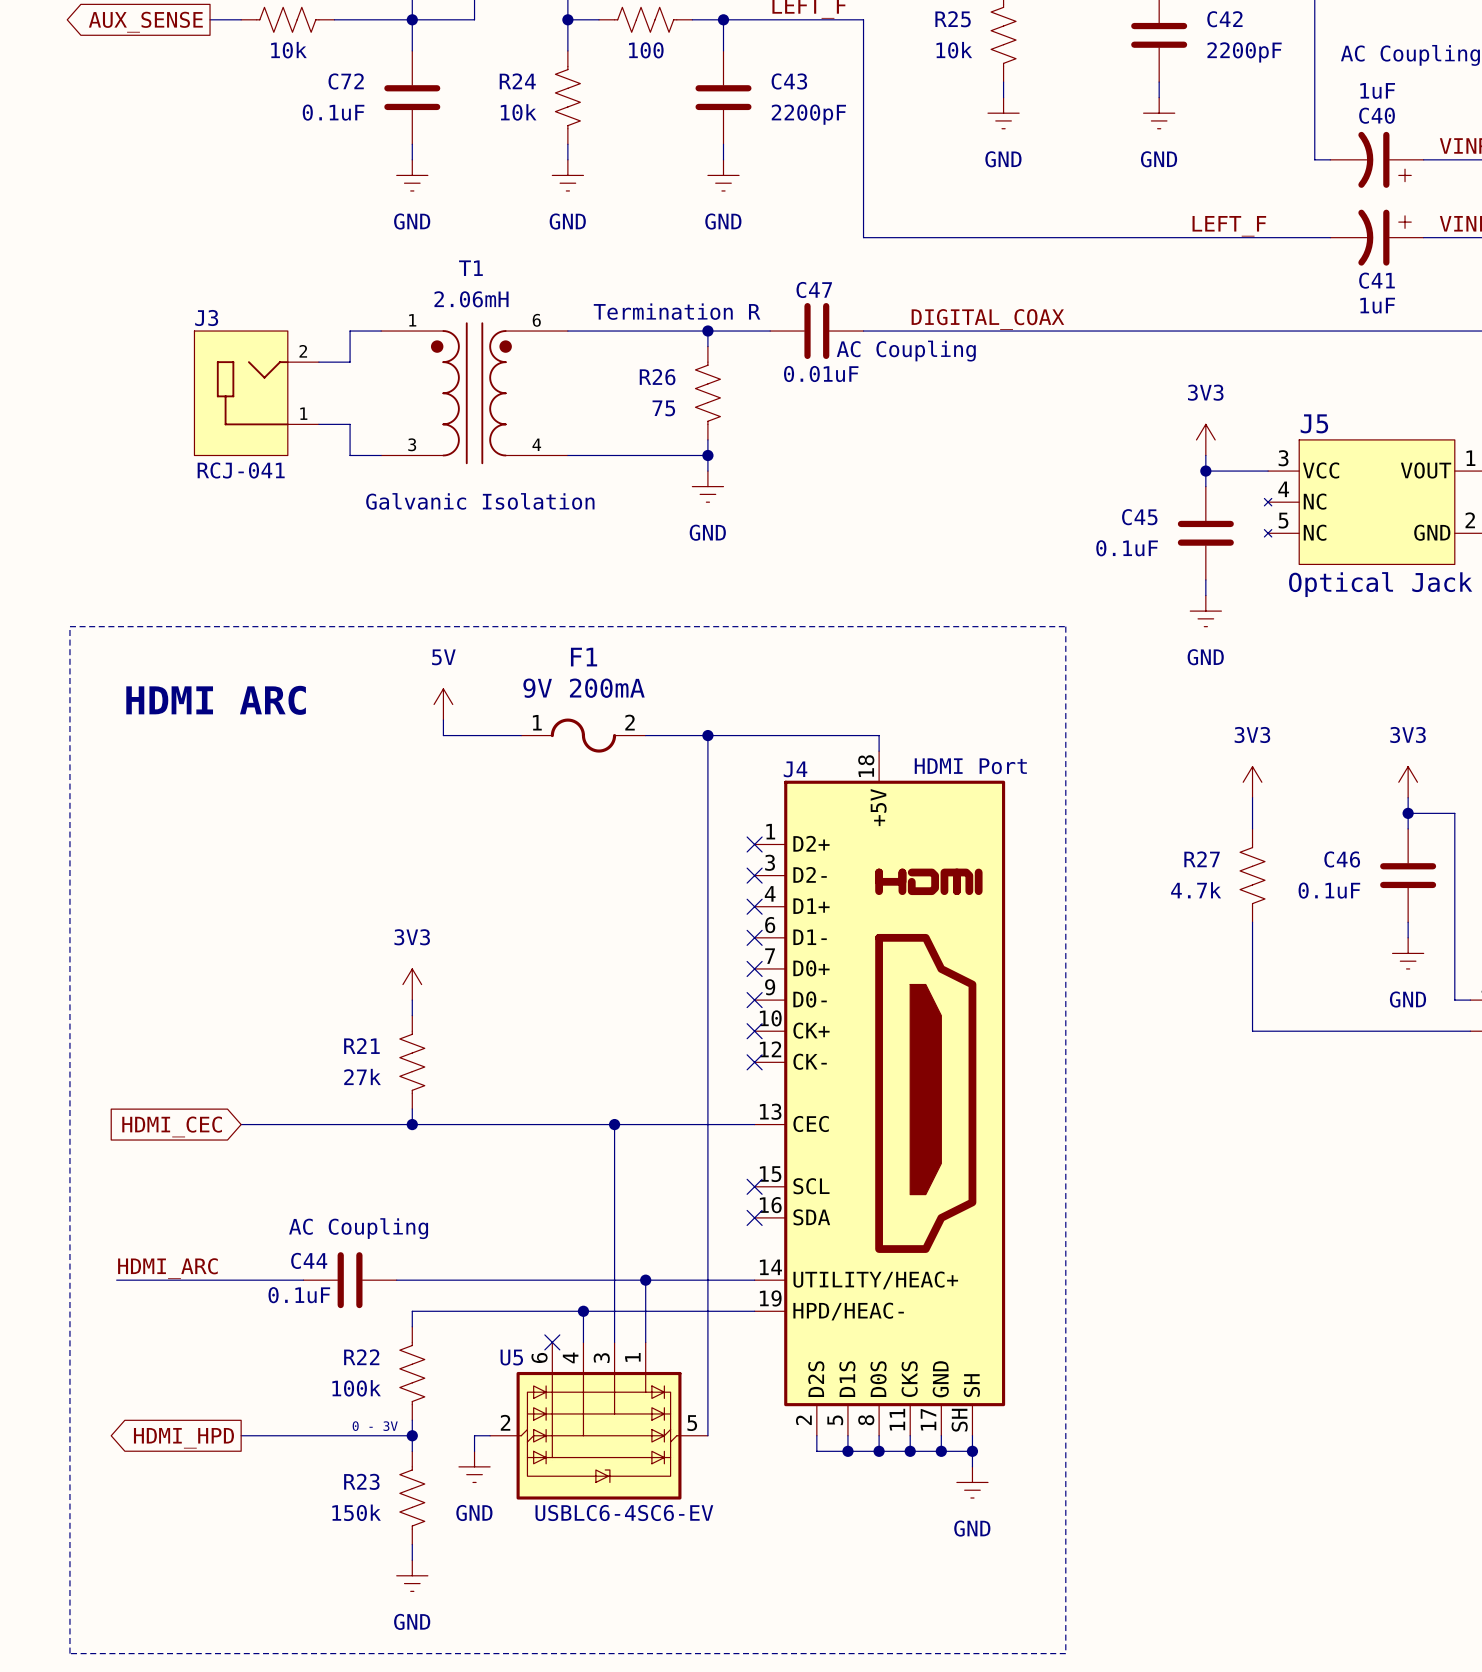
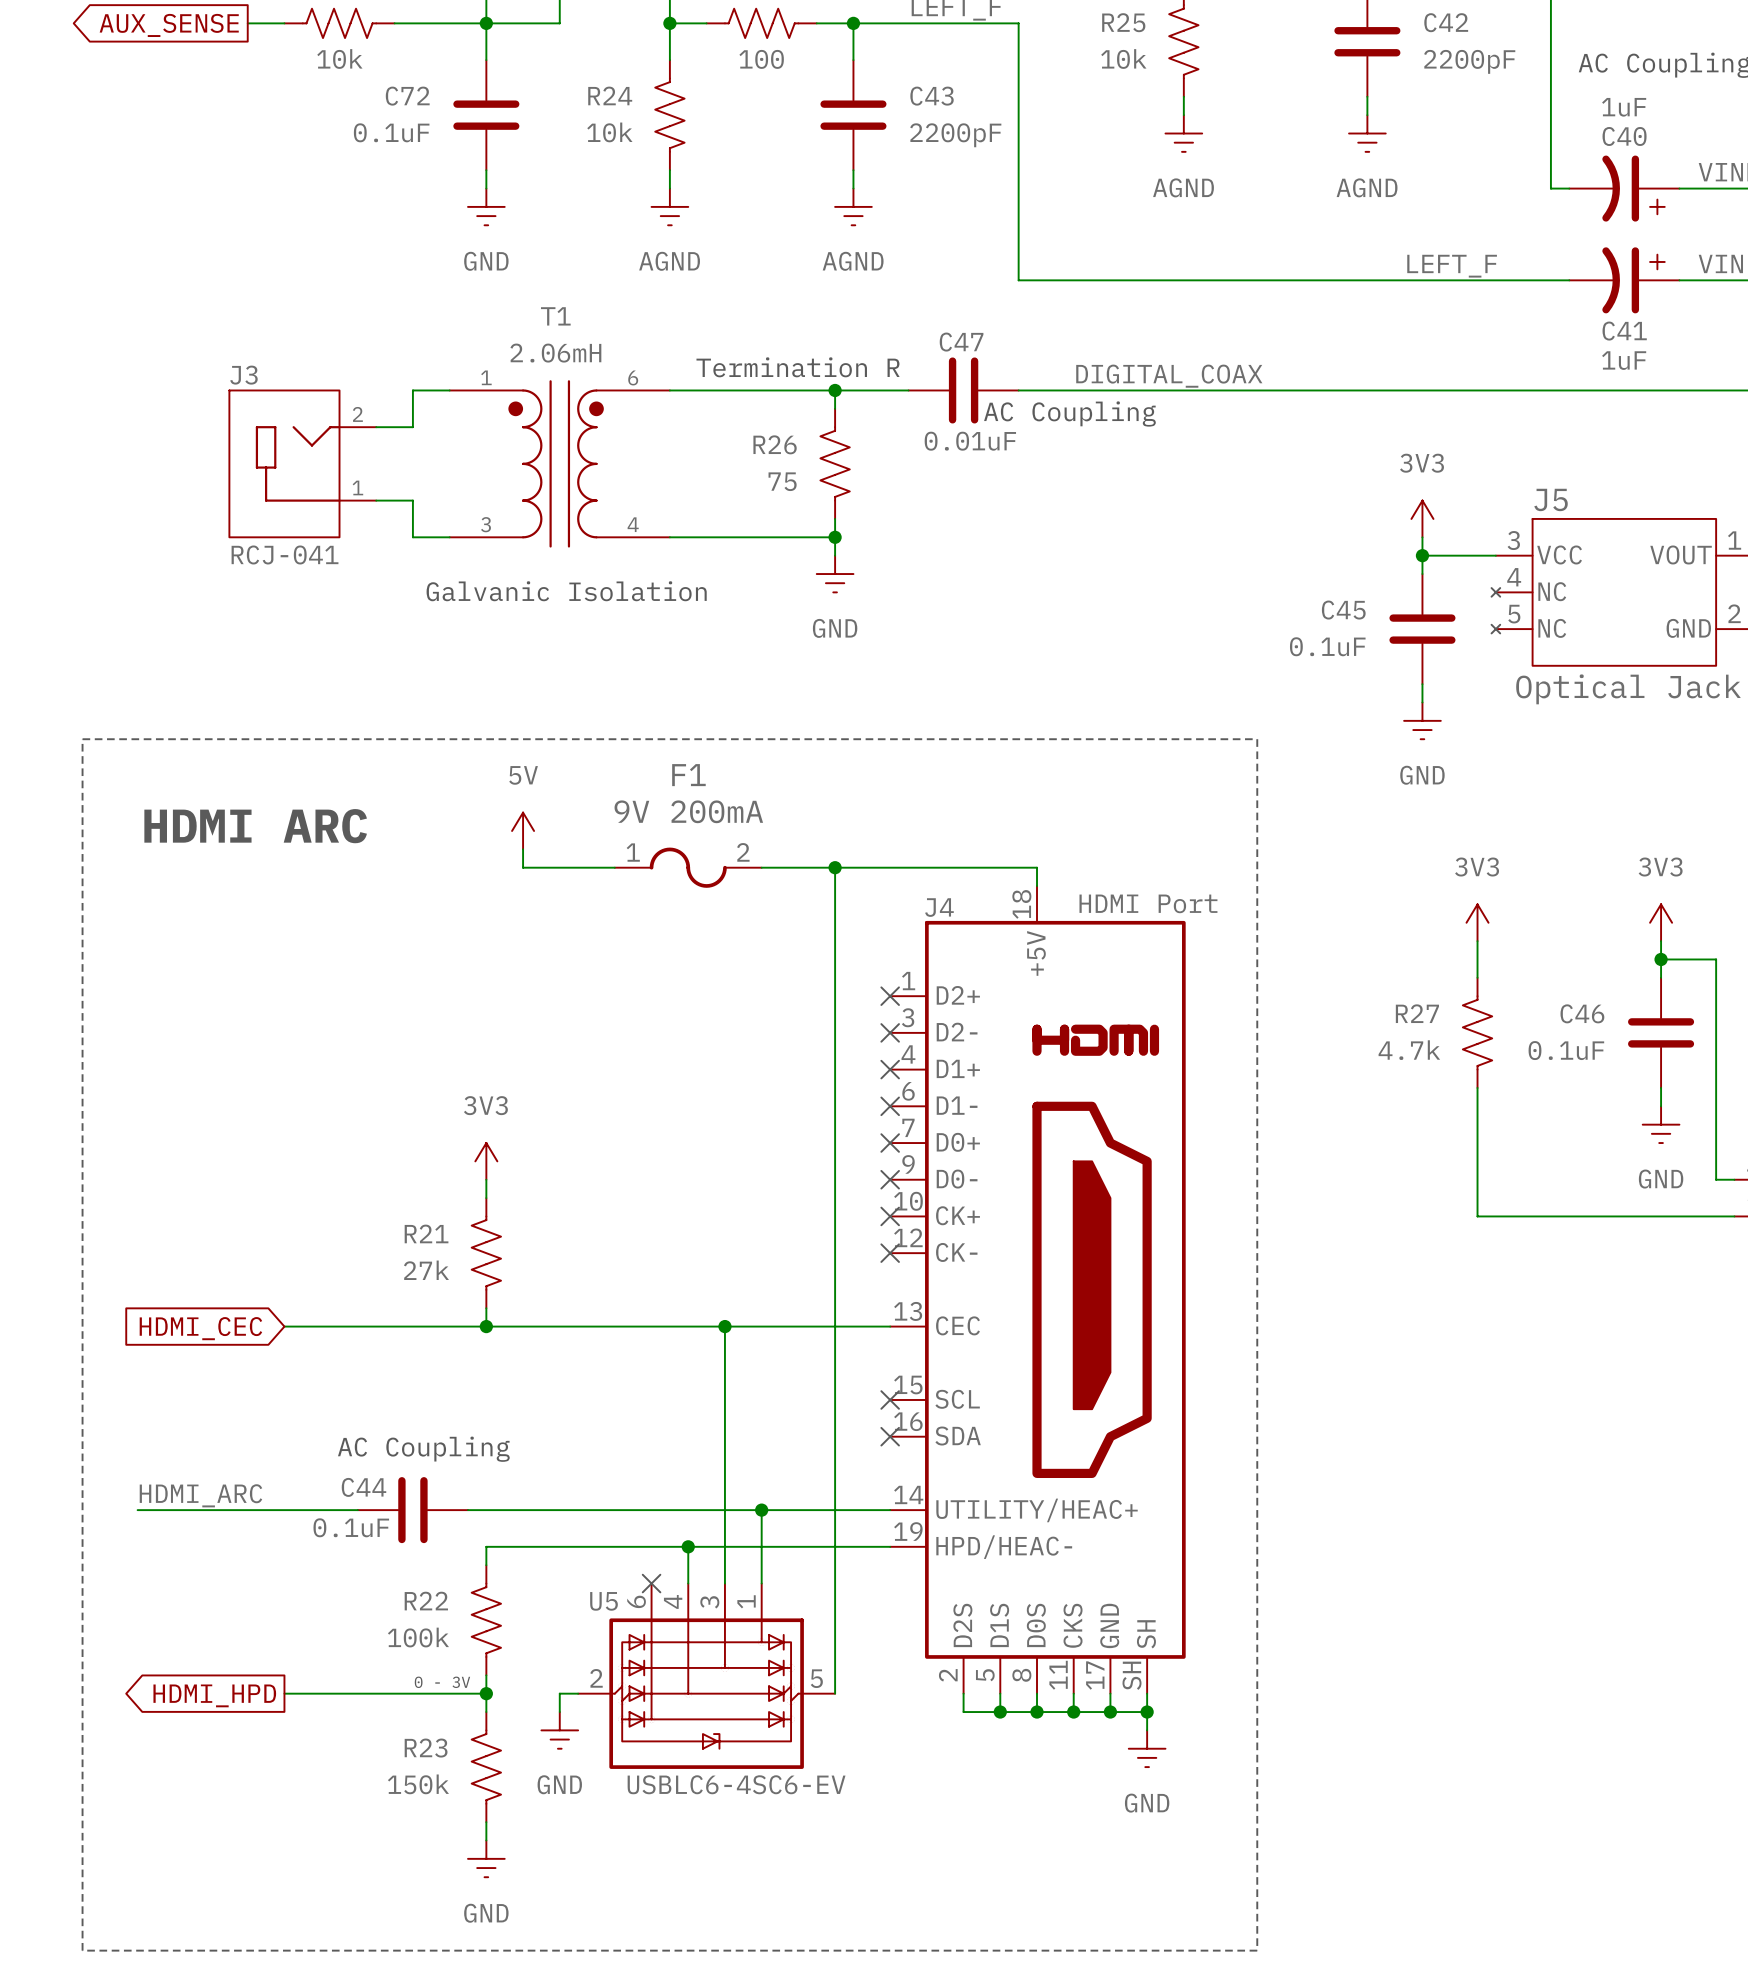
power symbol: GND (1003, 113) -> AGND (1183, 133)
power symbol: GND (1159, 113) -> AGND (1367, 133)
power symbol: GND (567, 175) -> AGND (669, 206)
power symbol: GND (723, 175) -> AGND (853, 206)

